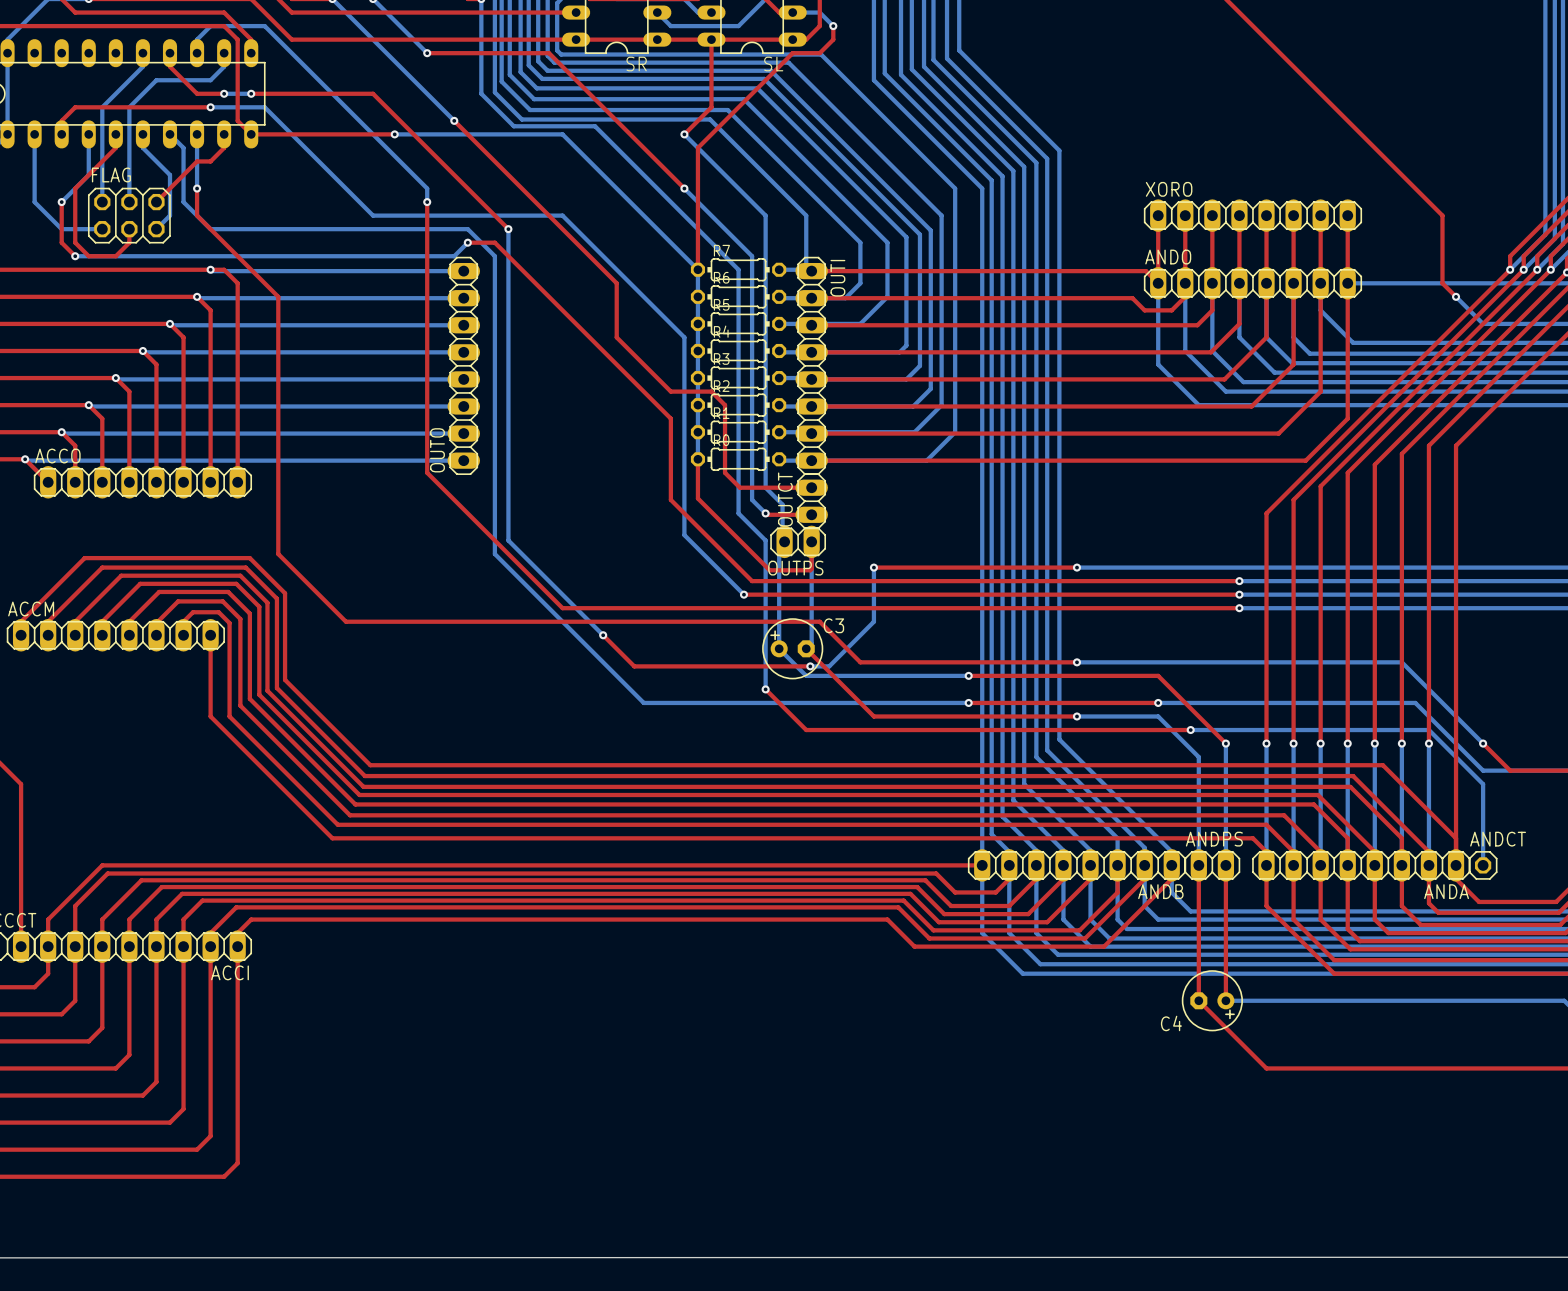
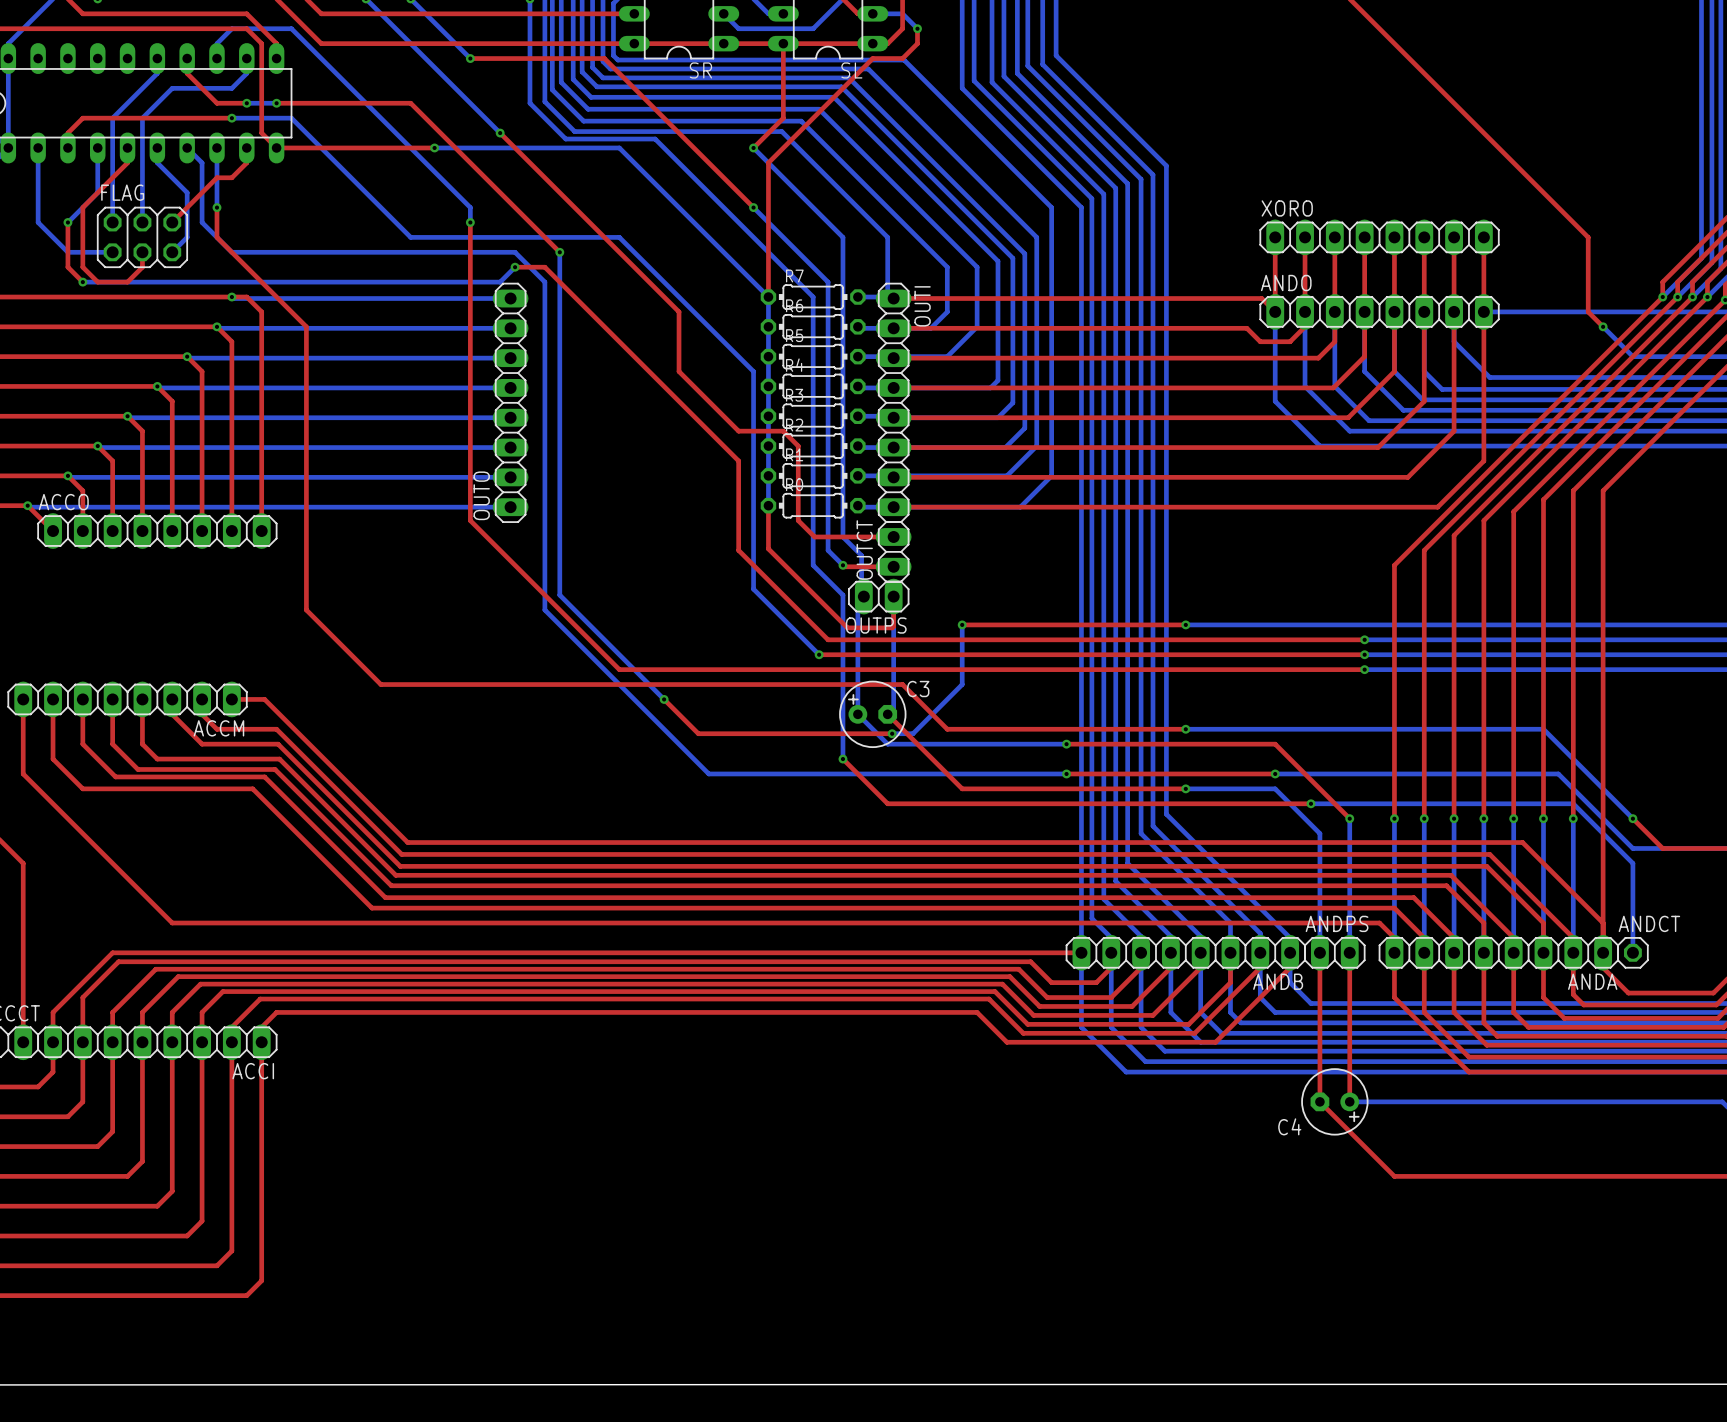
ACCM name position: ACCM (31, 609) -> ACCM (218, 728)
top track: (21, 635) (21, 621) (84, 558) (249, 558) (285, 593) (285, 679) -> (23, 699) (23, 773) (172, 923) (366, 923)
top track: (48, 635) (48, 621) (102, 567) (245, 567) (276, 598) (276, 688) -> (53, 699) (53, 759) (82, 788) (252, 788)
top track: (75, 635) (75, 621) (121, 575) (240, 575) (267, 602) (267, 690) -> (82, 699) (82, 744) (115, 776) (264, 776)
top track: (102, 635) (102, 621) (140, 583) (236, 583) (259, 606) (259, 694) -> (112, 699) (112, 744) (137, 769) (275, 769)
top track: (129, 635) (129, 621) (159, 591) (228, 591) (249, 613) (249, 698) -> (142, 699) (142, 744) (157, 759) (279, 759) (285, 765)
top track: (156, 635) (156, 623) (178, 601) (222, 601) (240, 619) (240, 705) -> (172, 699) (172, 714) (202, 744) (278, 744) (294, 760)
top track: (183, 635) (183, 621) (193, 612) (218, 612) (229, 623) (229, 716) -> (202, 699) (202, 714) (216, 729) (276, 729) (304, 757)
top track: (210, 635) (210, 716) (332, 838) -> (231, 699) (264, 699) (313, 748)

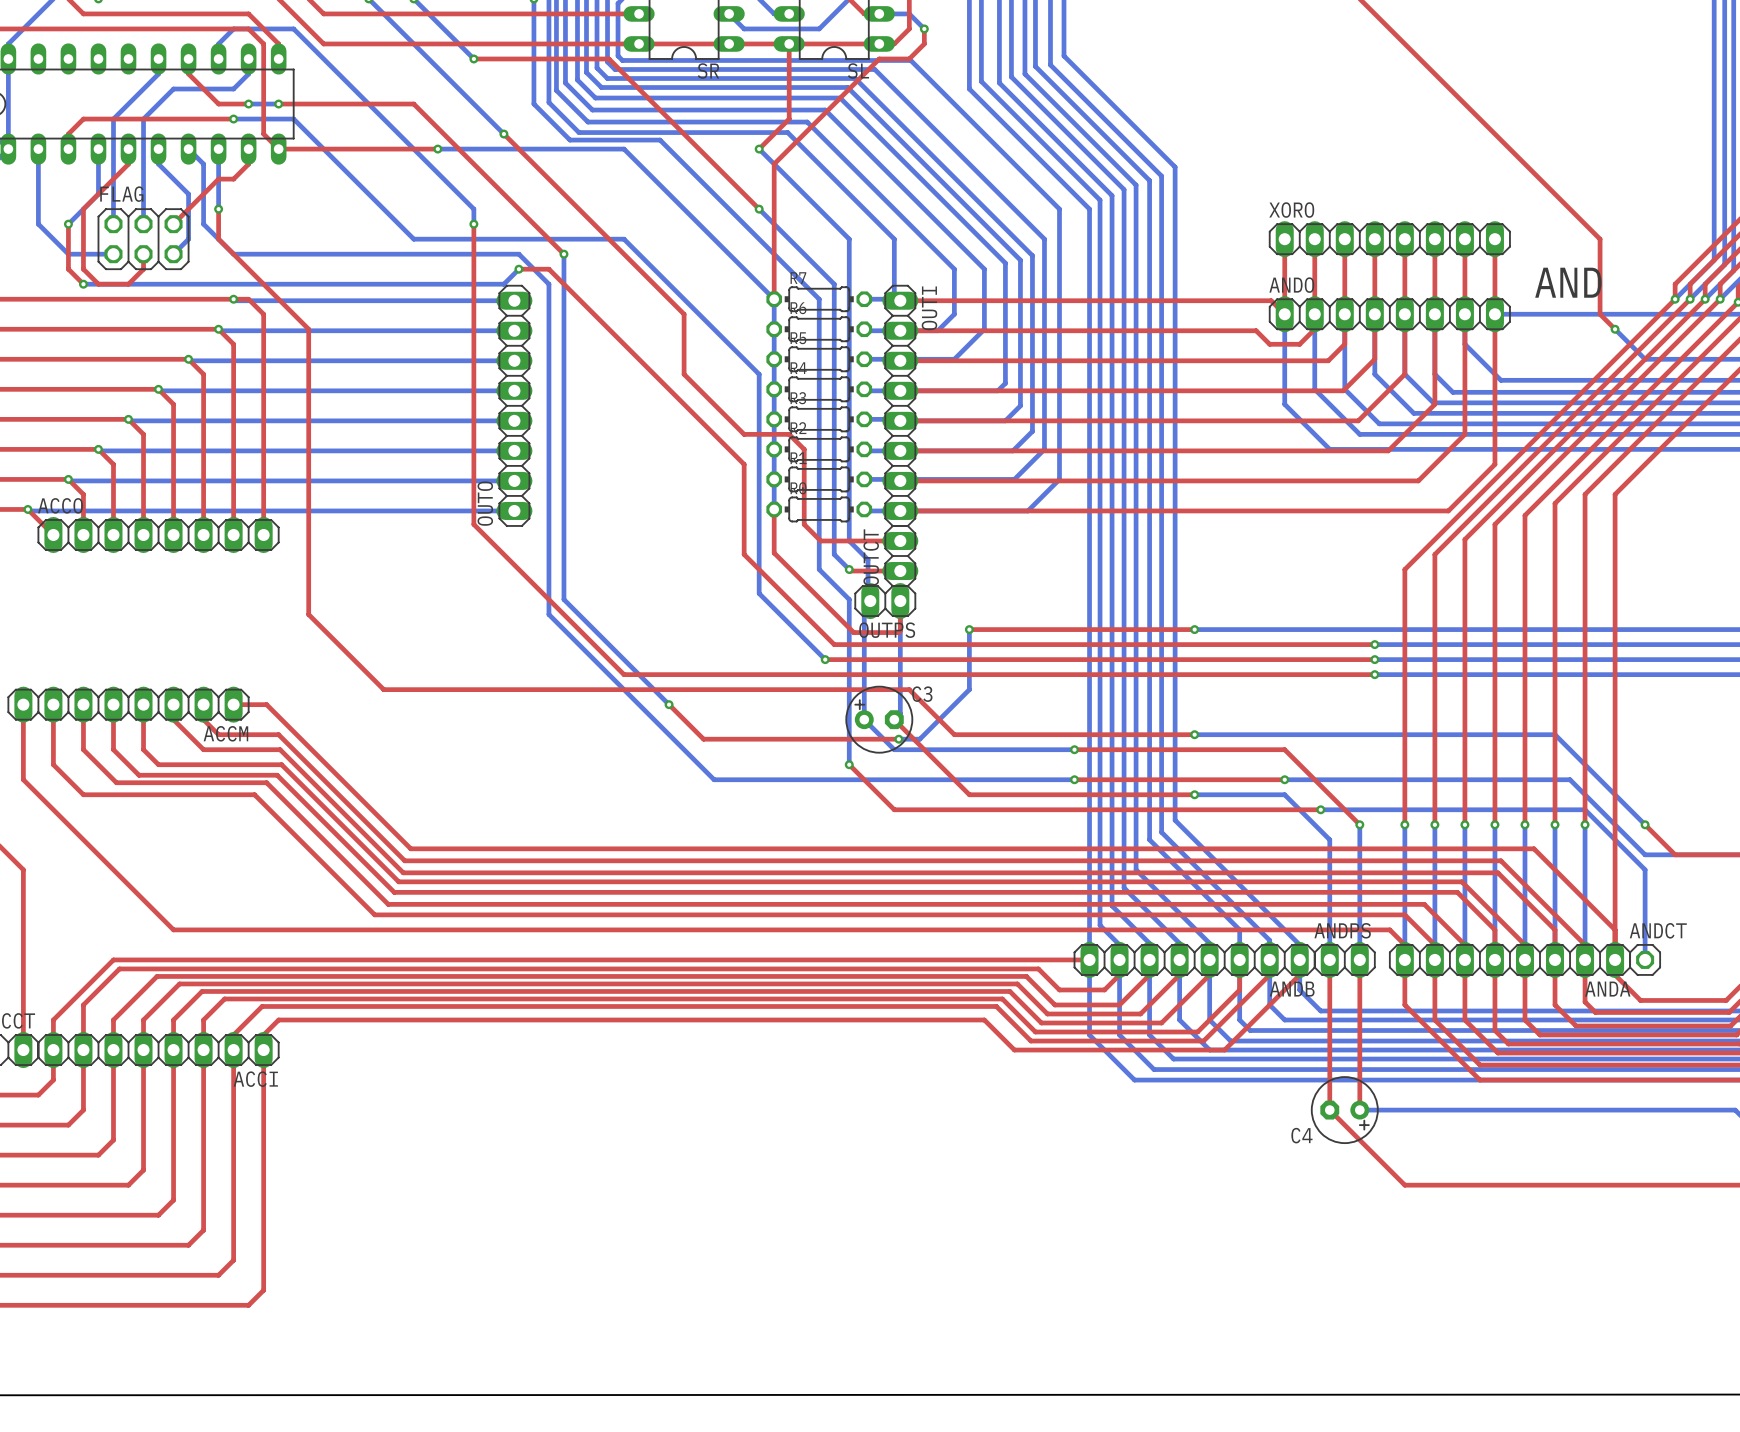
text: none -> AND (1568, 282)

